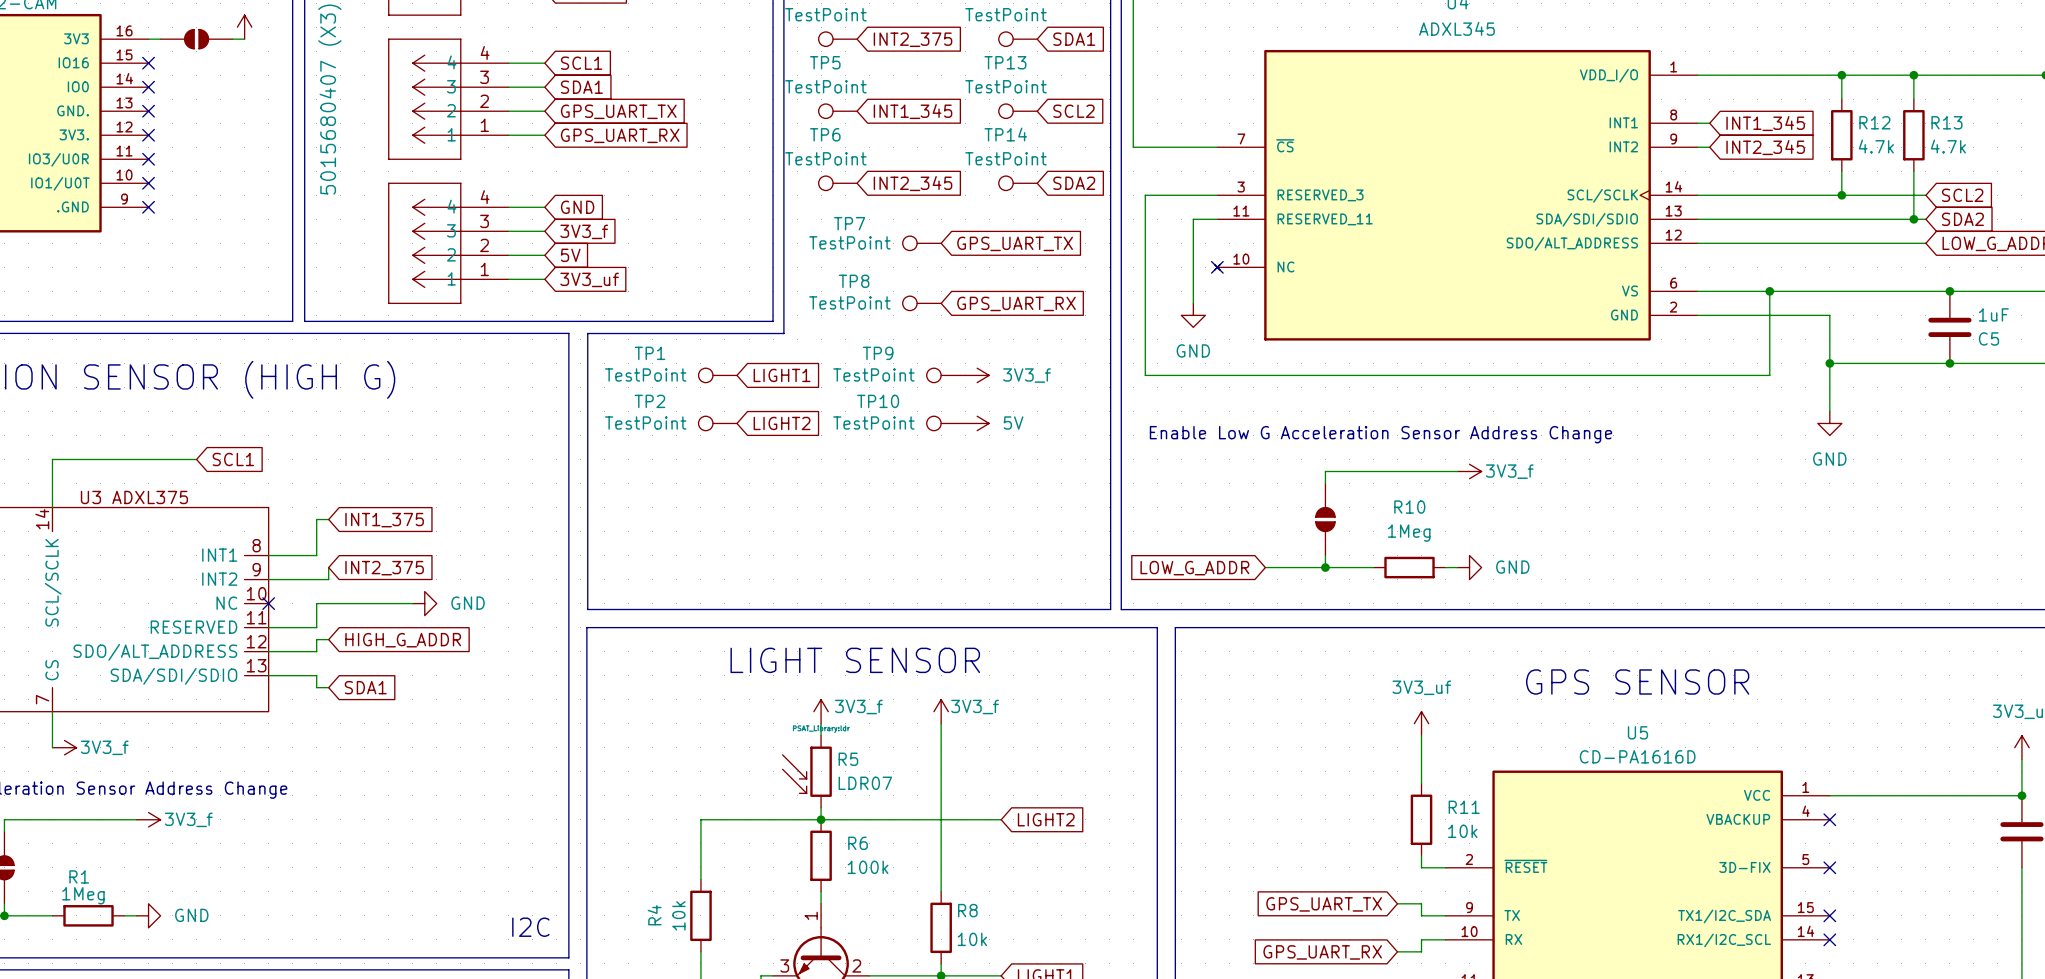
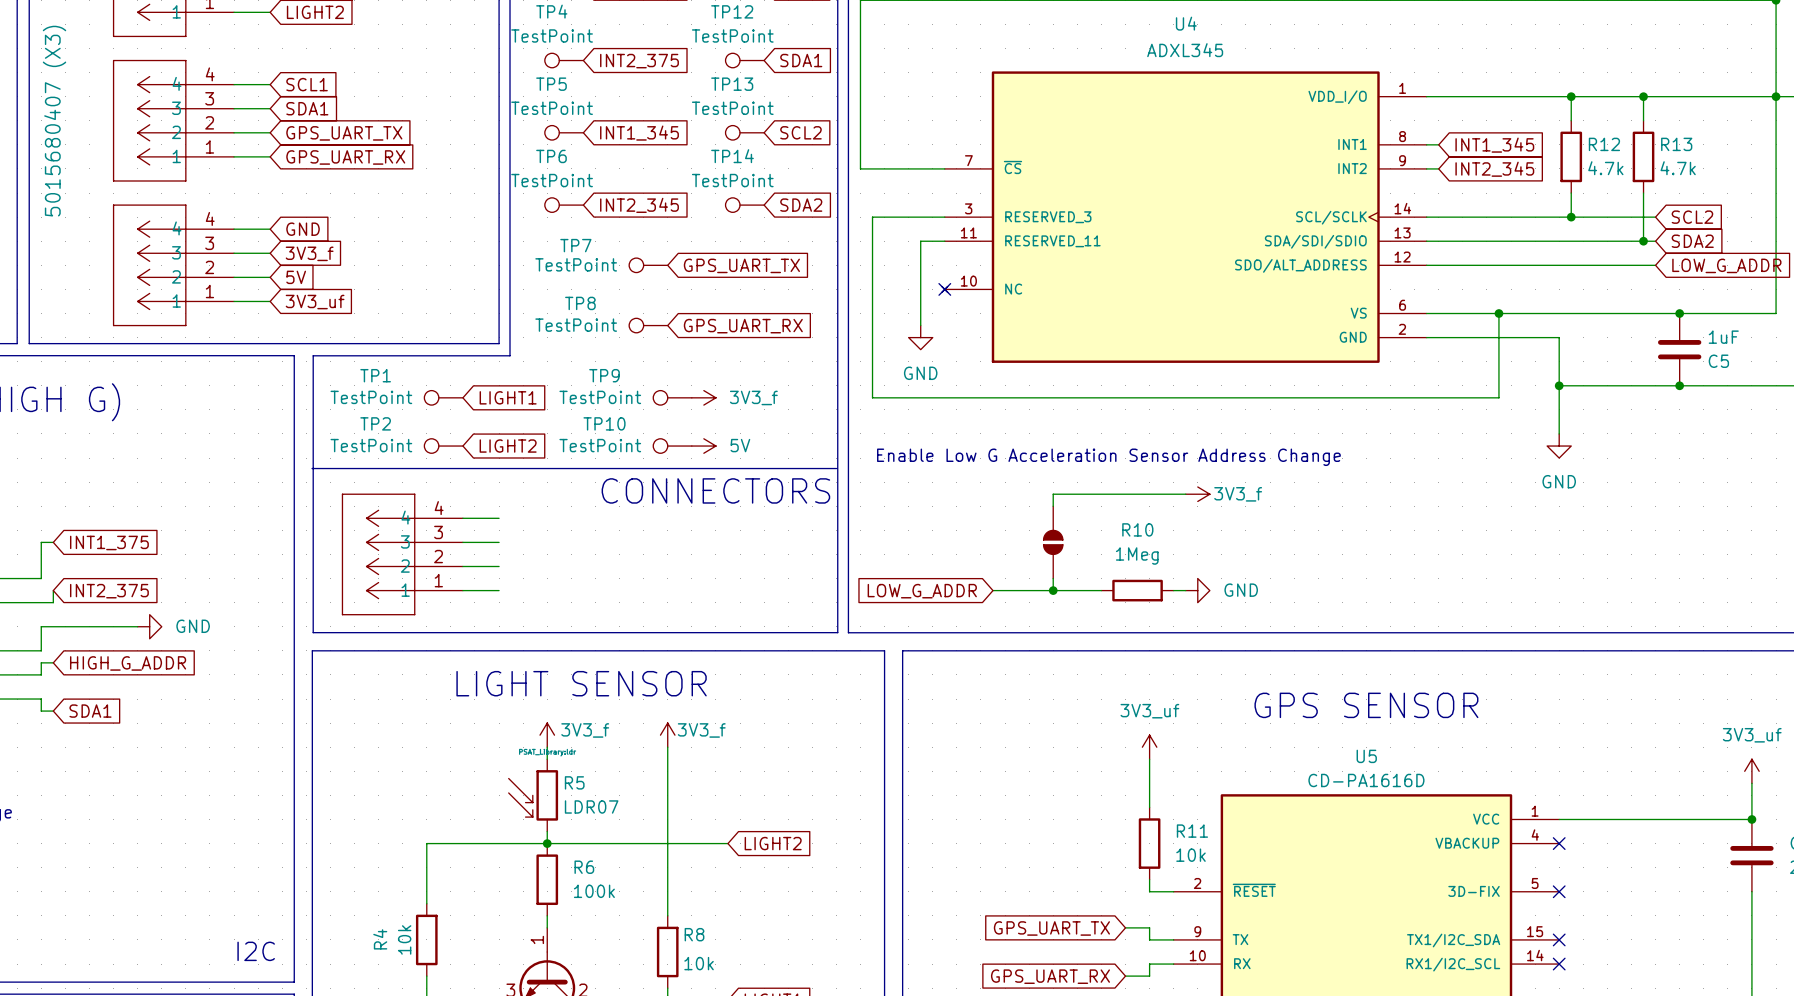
line: none -> (312, 468) (836, 468)
text: none -> CONNECTORS (715, 490)
wire: none -> (462, 518) (499, 518)
wire: none -> (462, 542) (499, 542)
part: none -> (402, 554)
wire: none -> (462, 566) (499, 566)
wire: none -> (462, 590) (499, 590)

